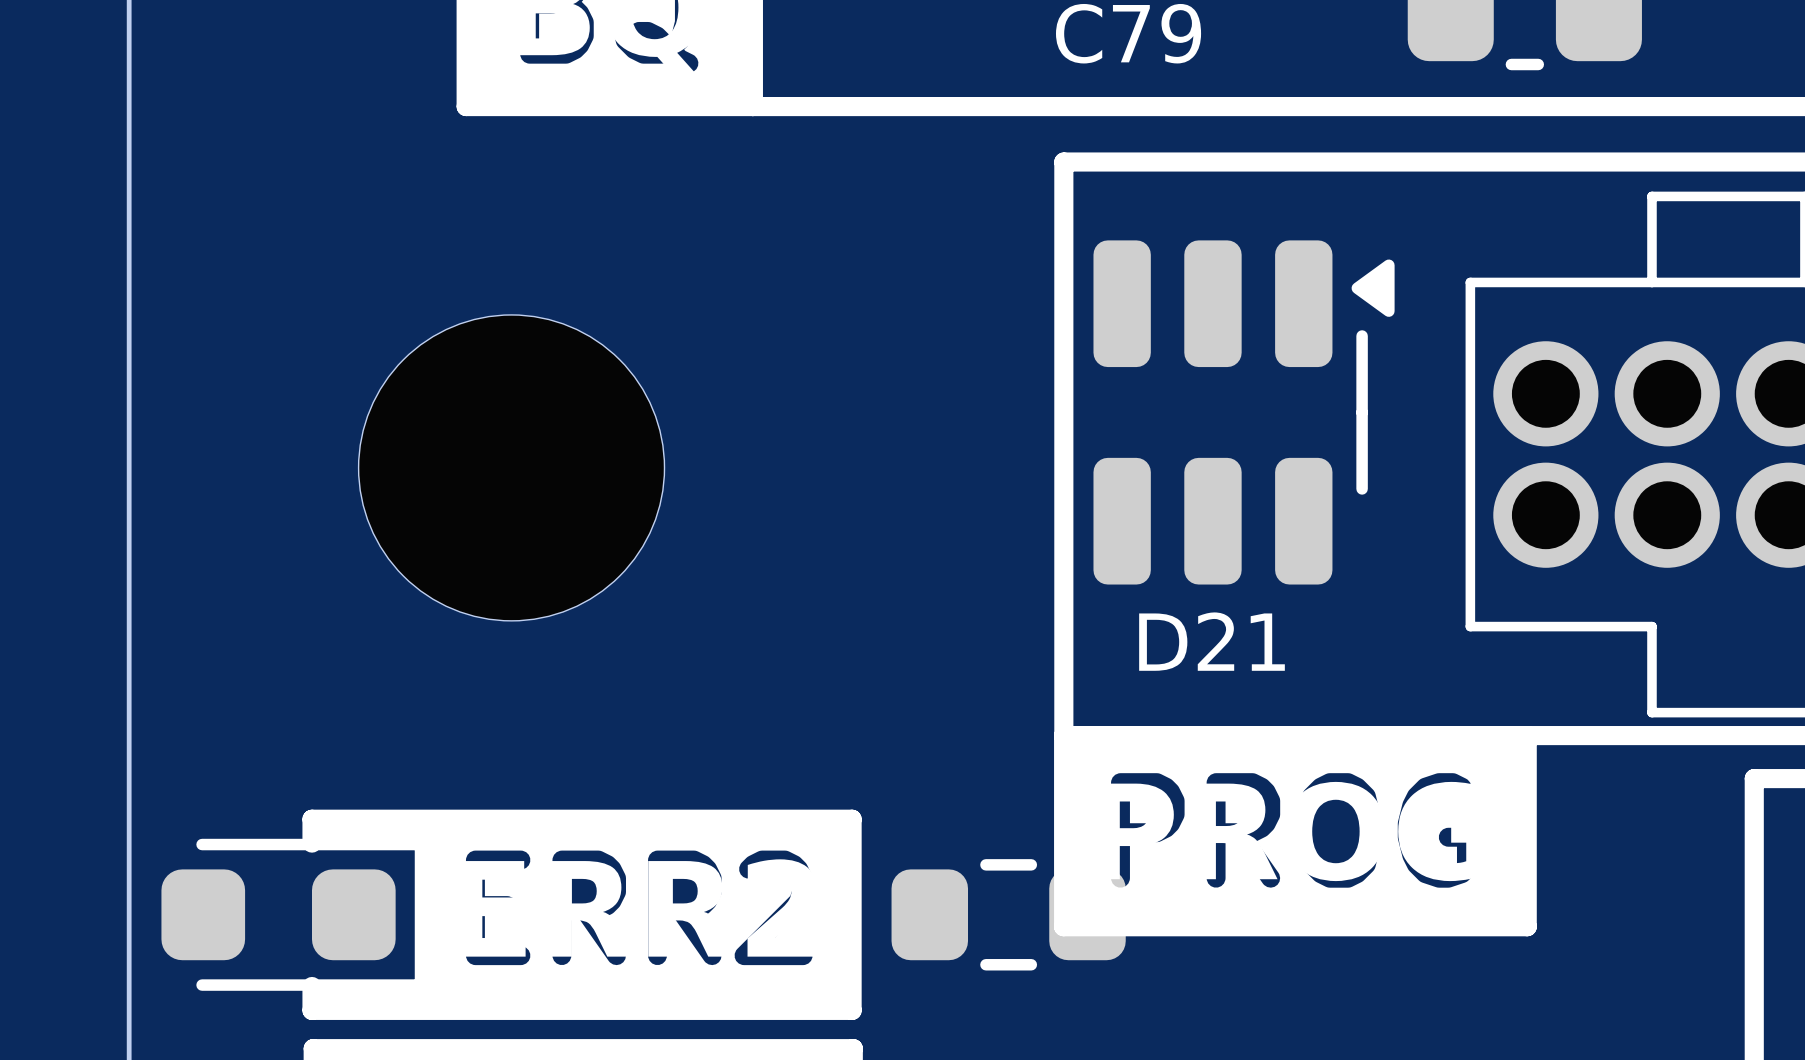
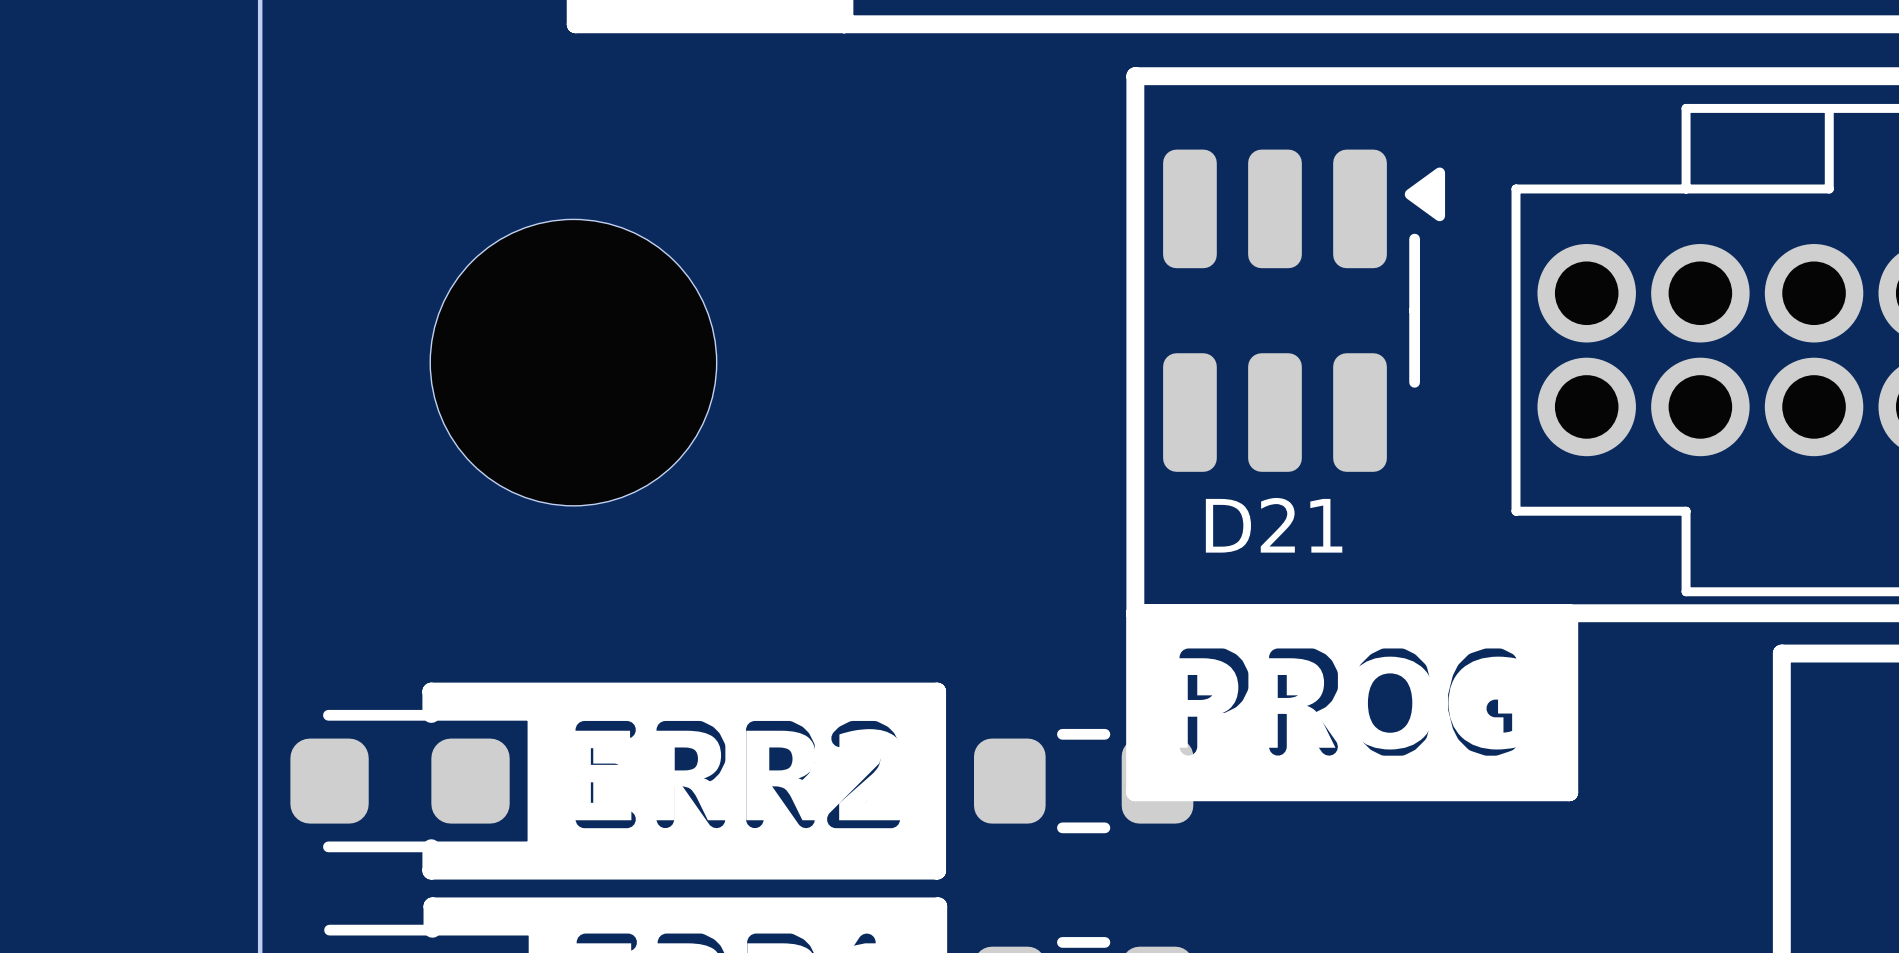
part position: (511, 467) -> (573, 362)

